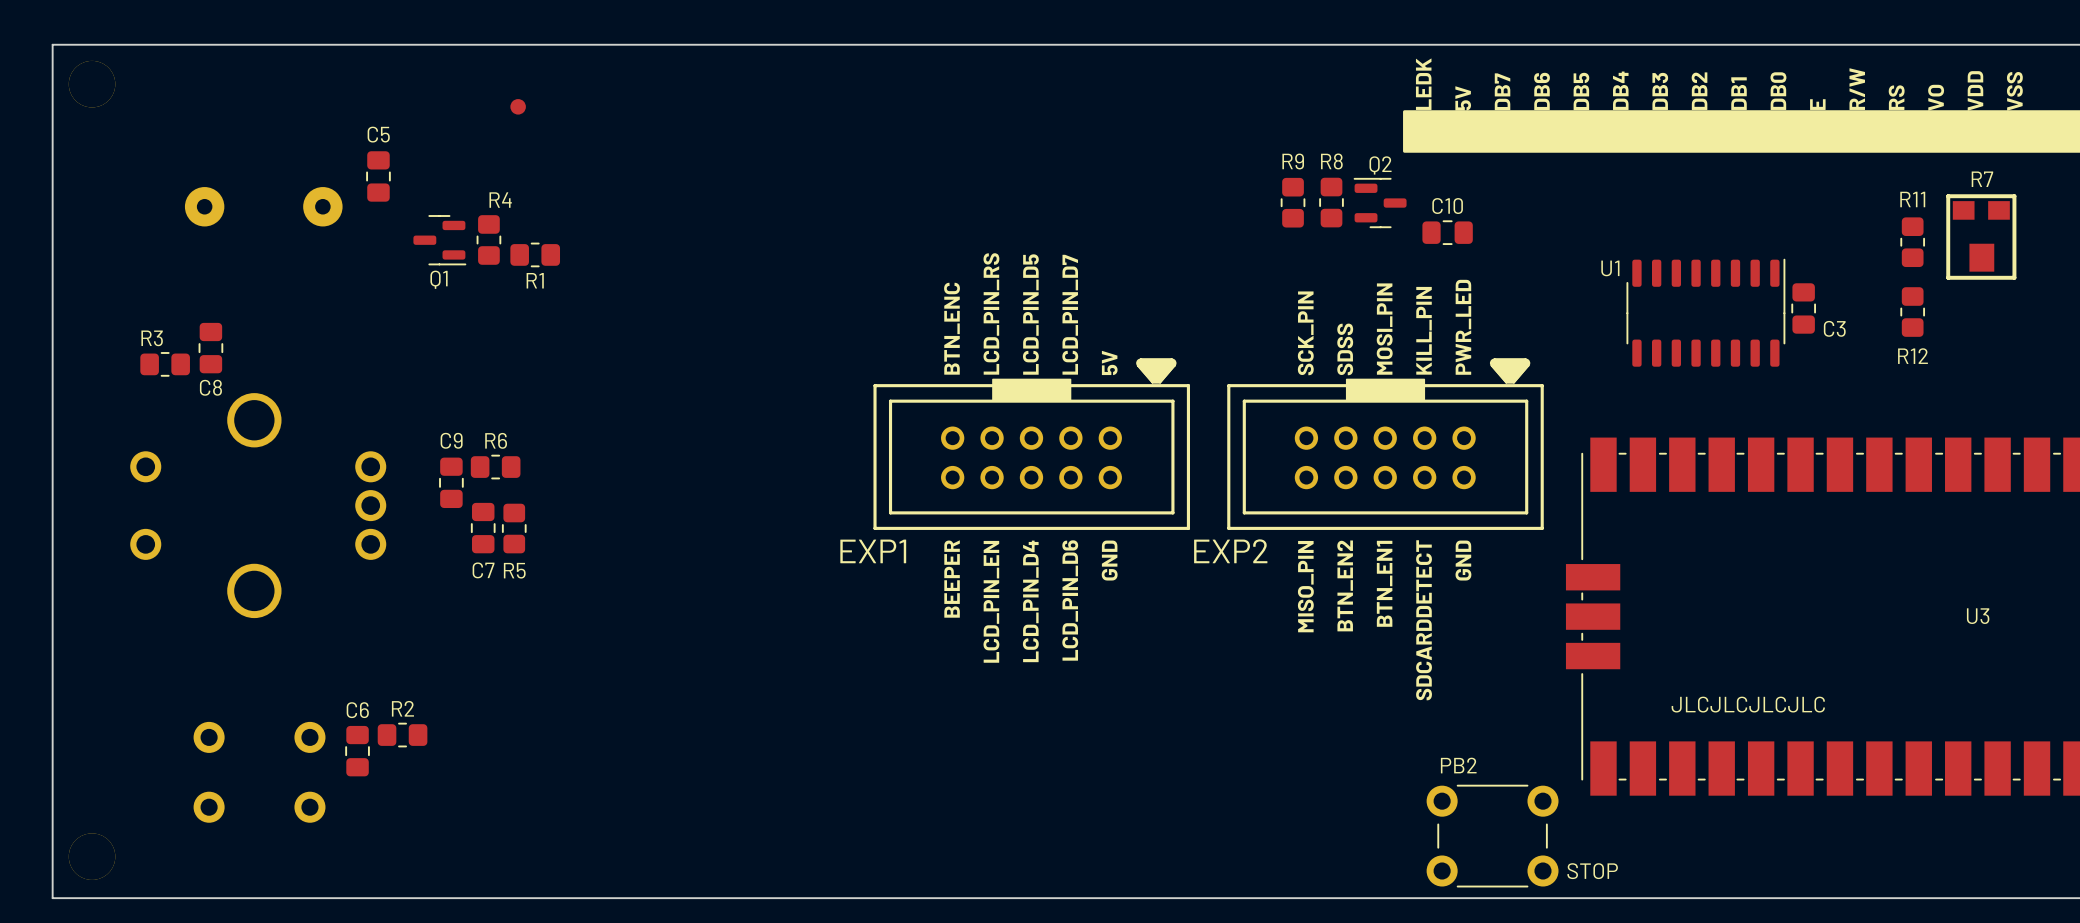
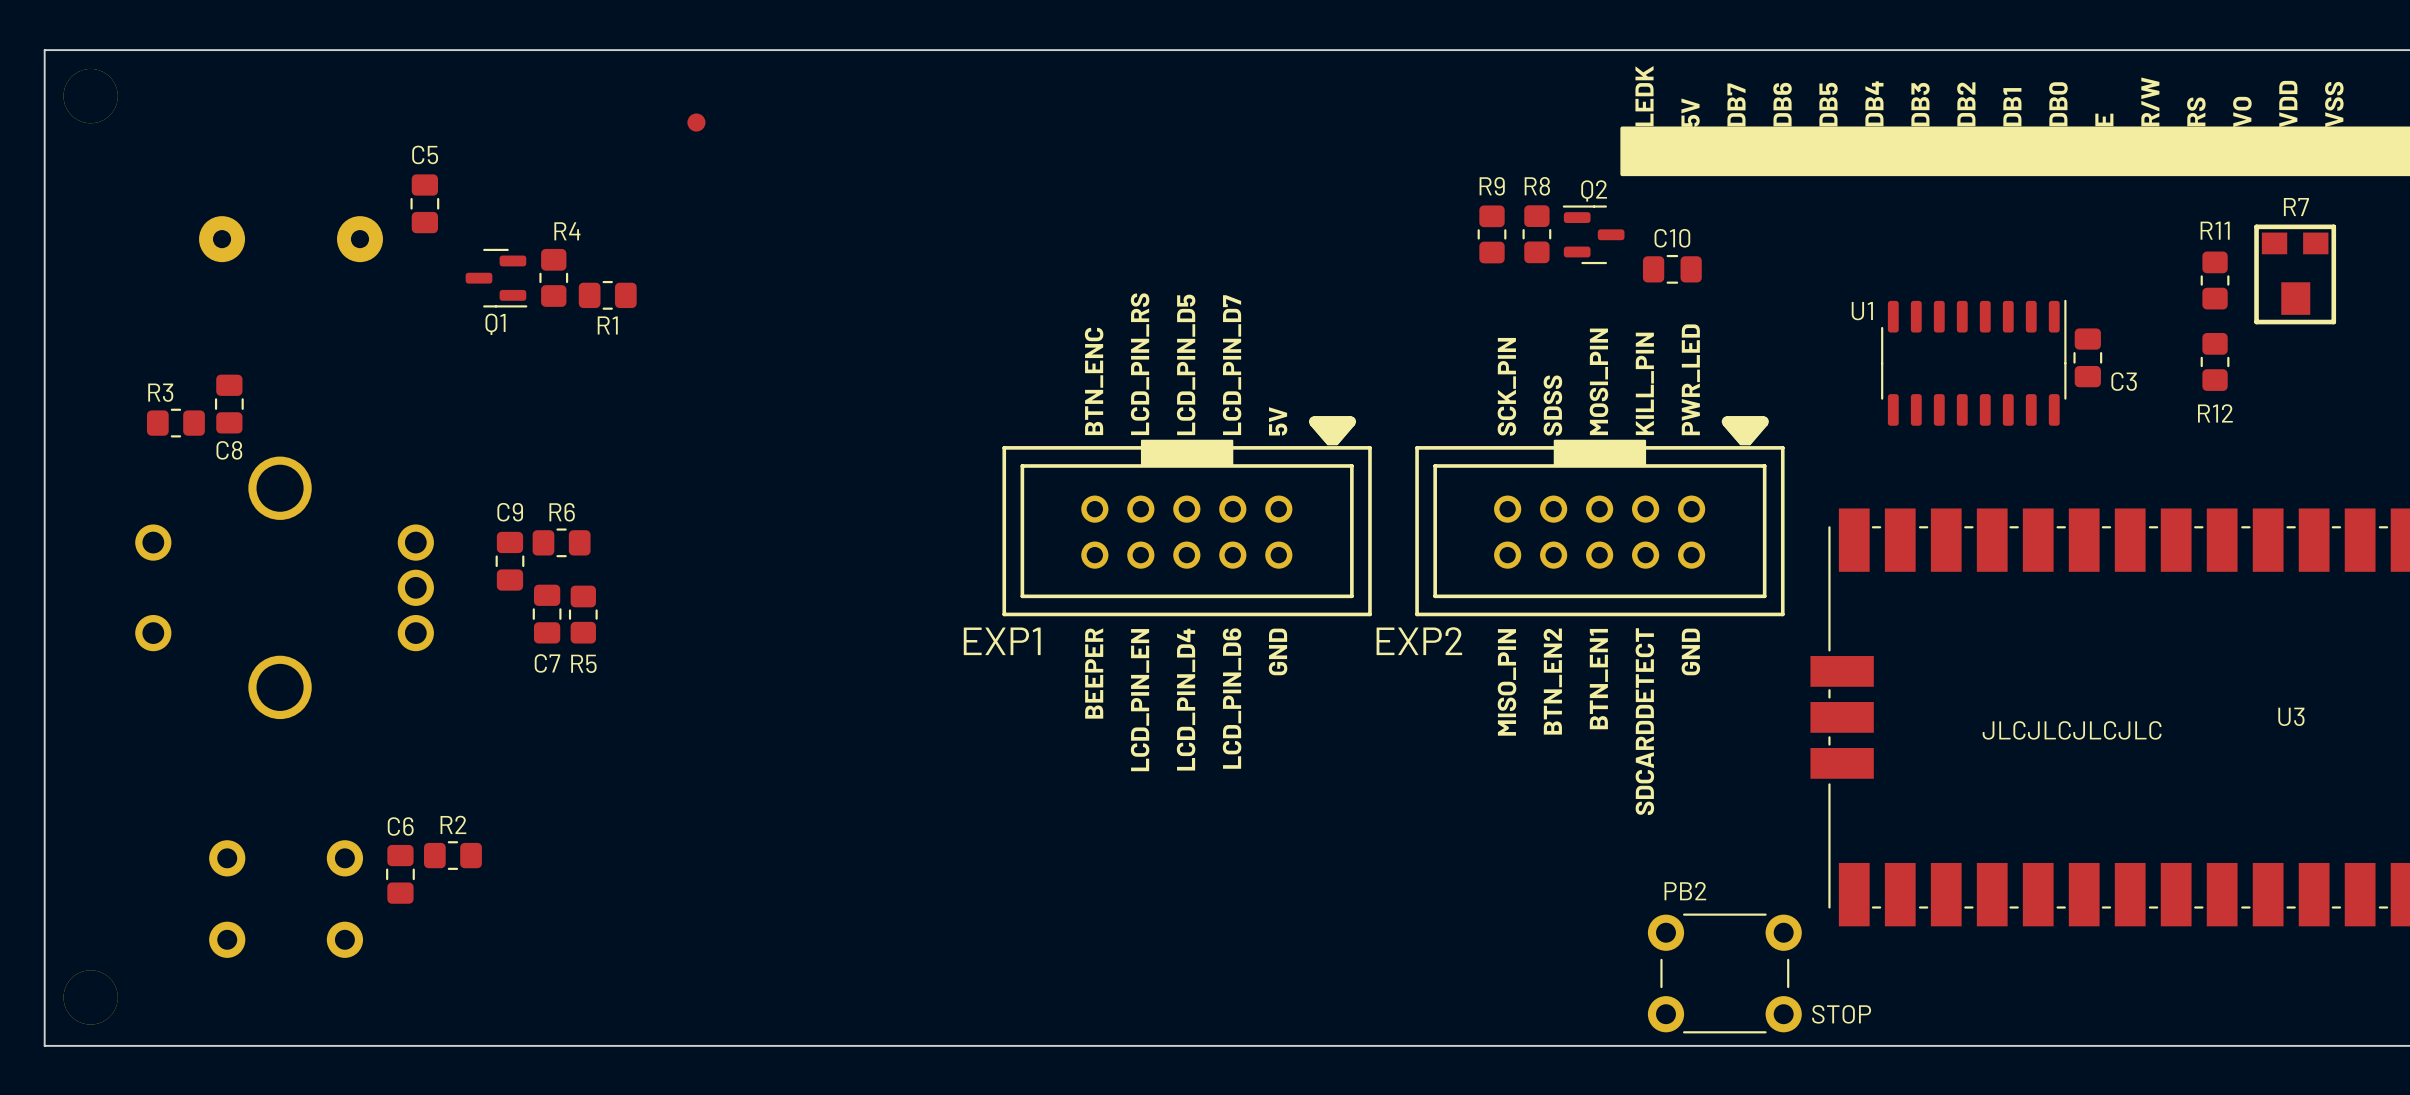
part position: (518, 106) -> (696, 122)
text position: JLCJLCJLCJLC (1748, 704) -> JLCJLCJLCJLC (2072, 730)

